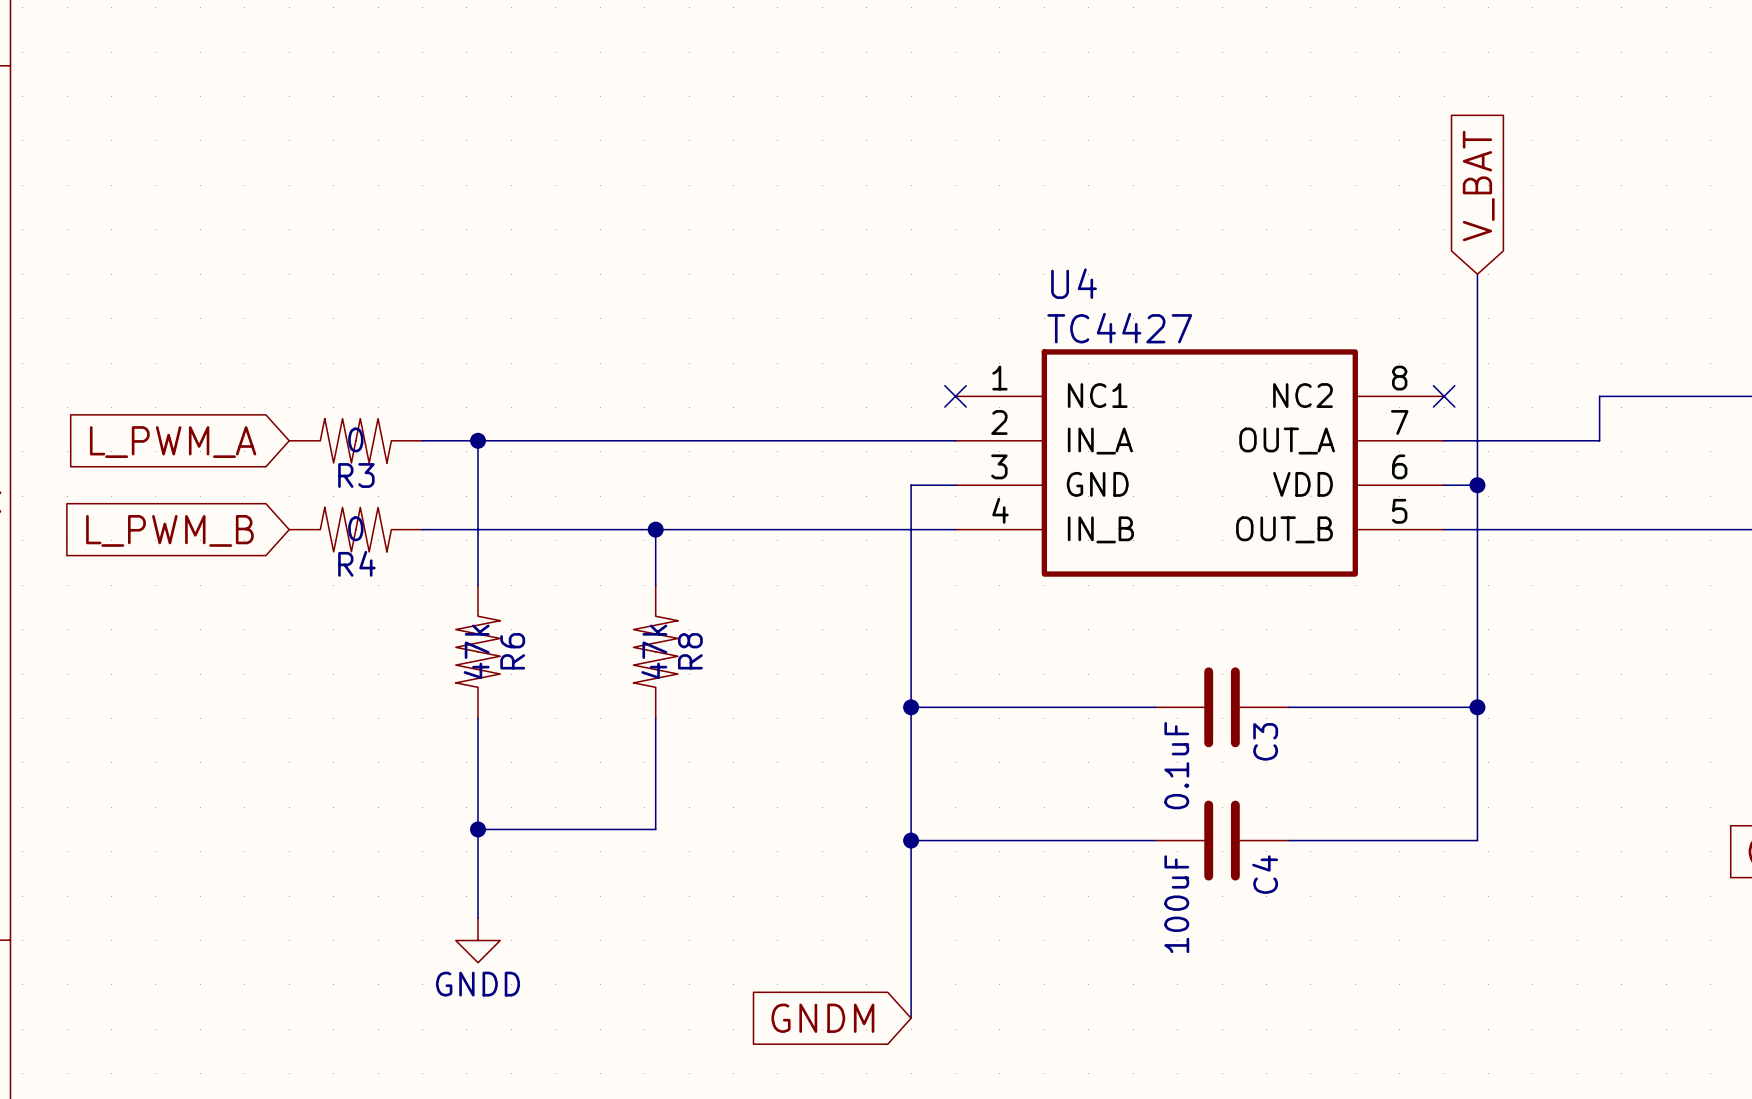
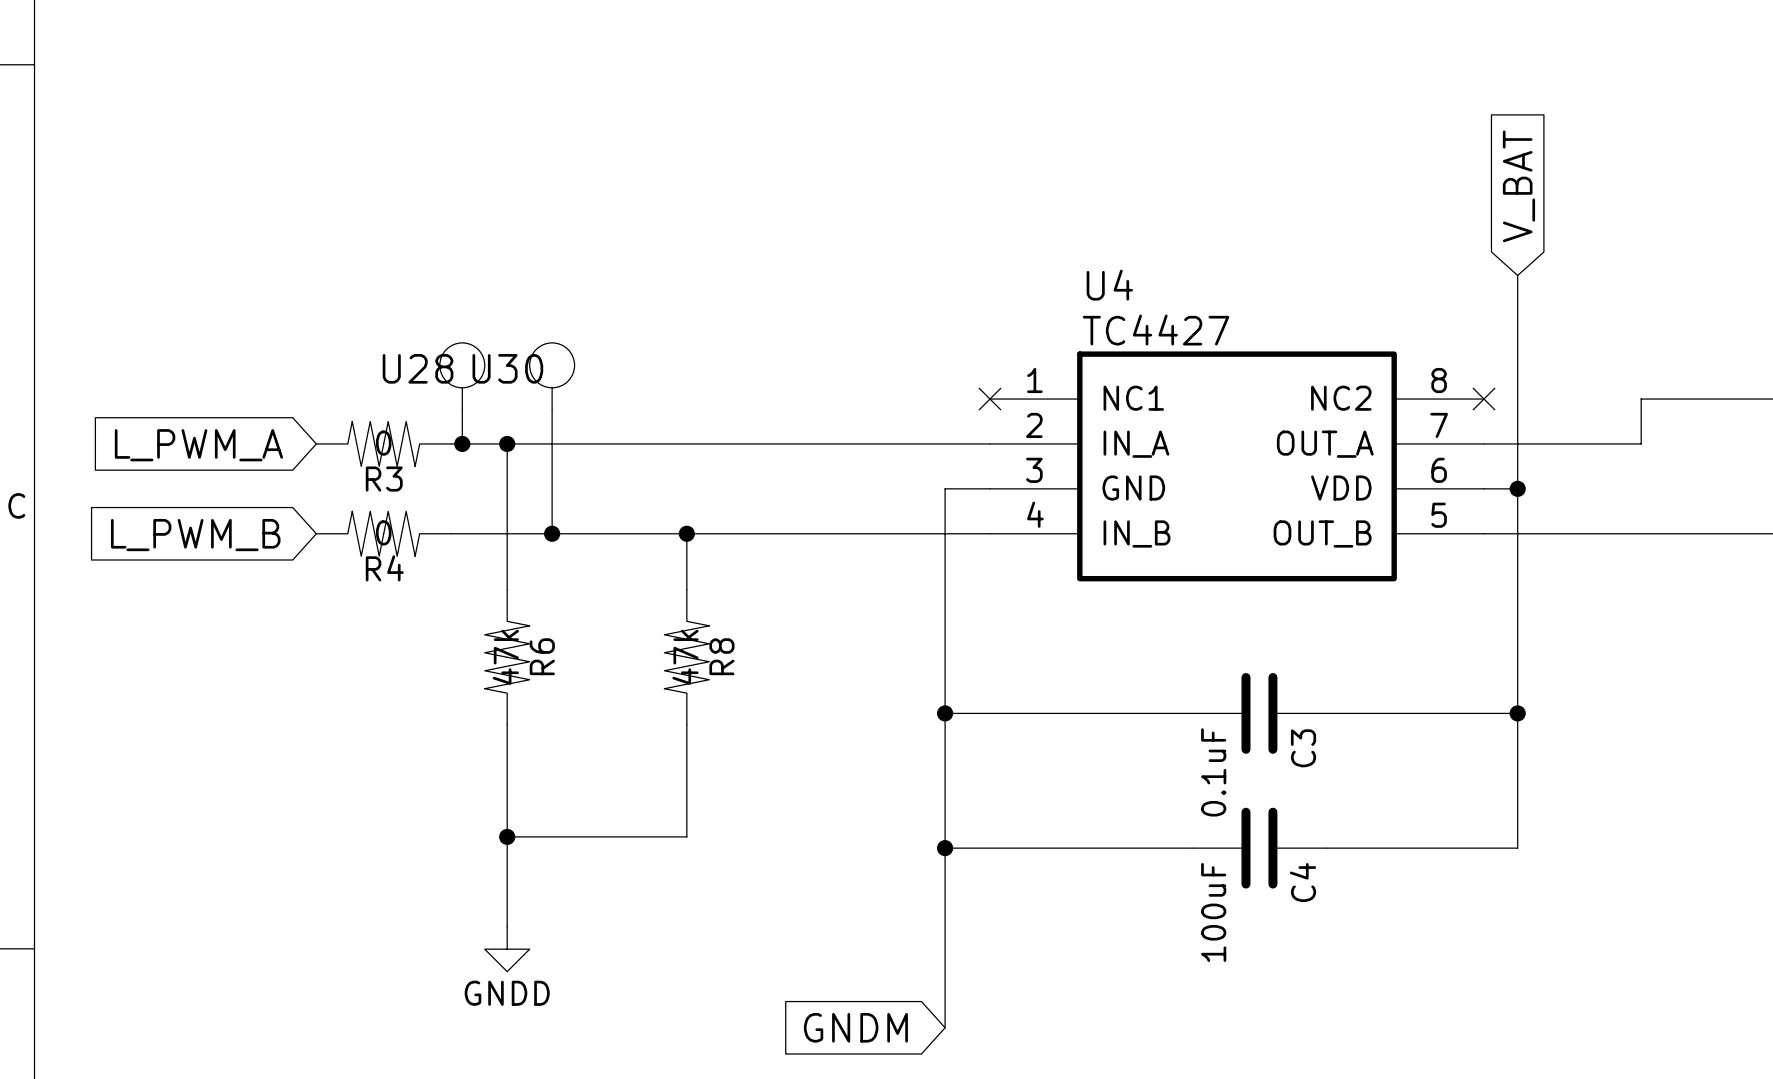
U28: none -> (462, 376)
U30: none -> (552, 376)
wire: none -> (462, 410) (462, 443)
wire: none -> (552, 410) (552, 533)
junction: none -> (462, 443)
junction: none -> (552, 533)

